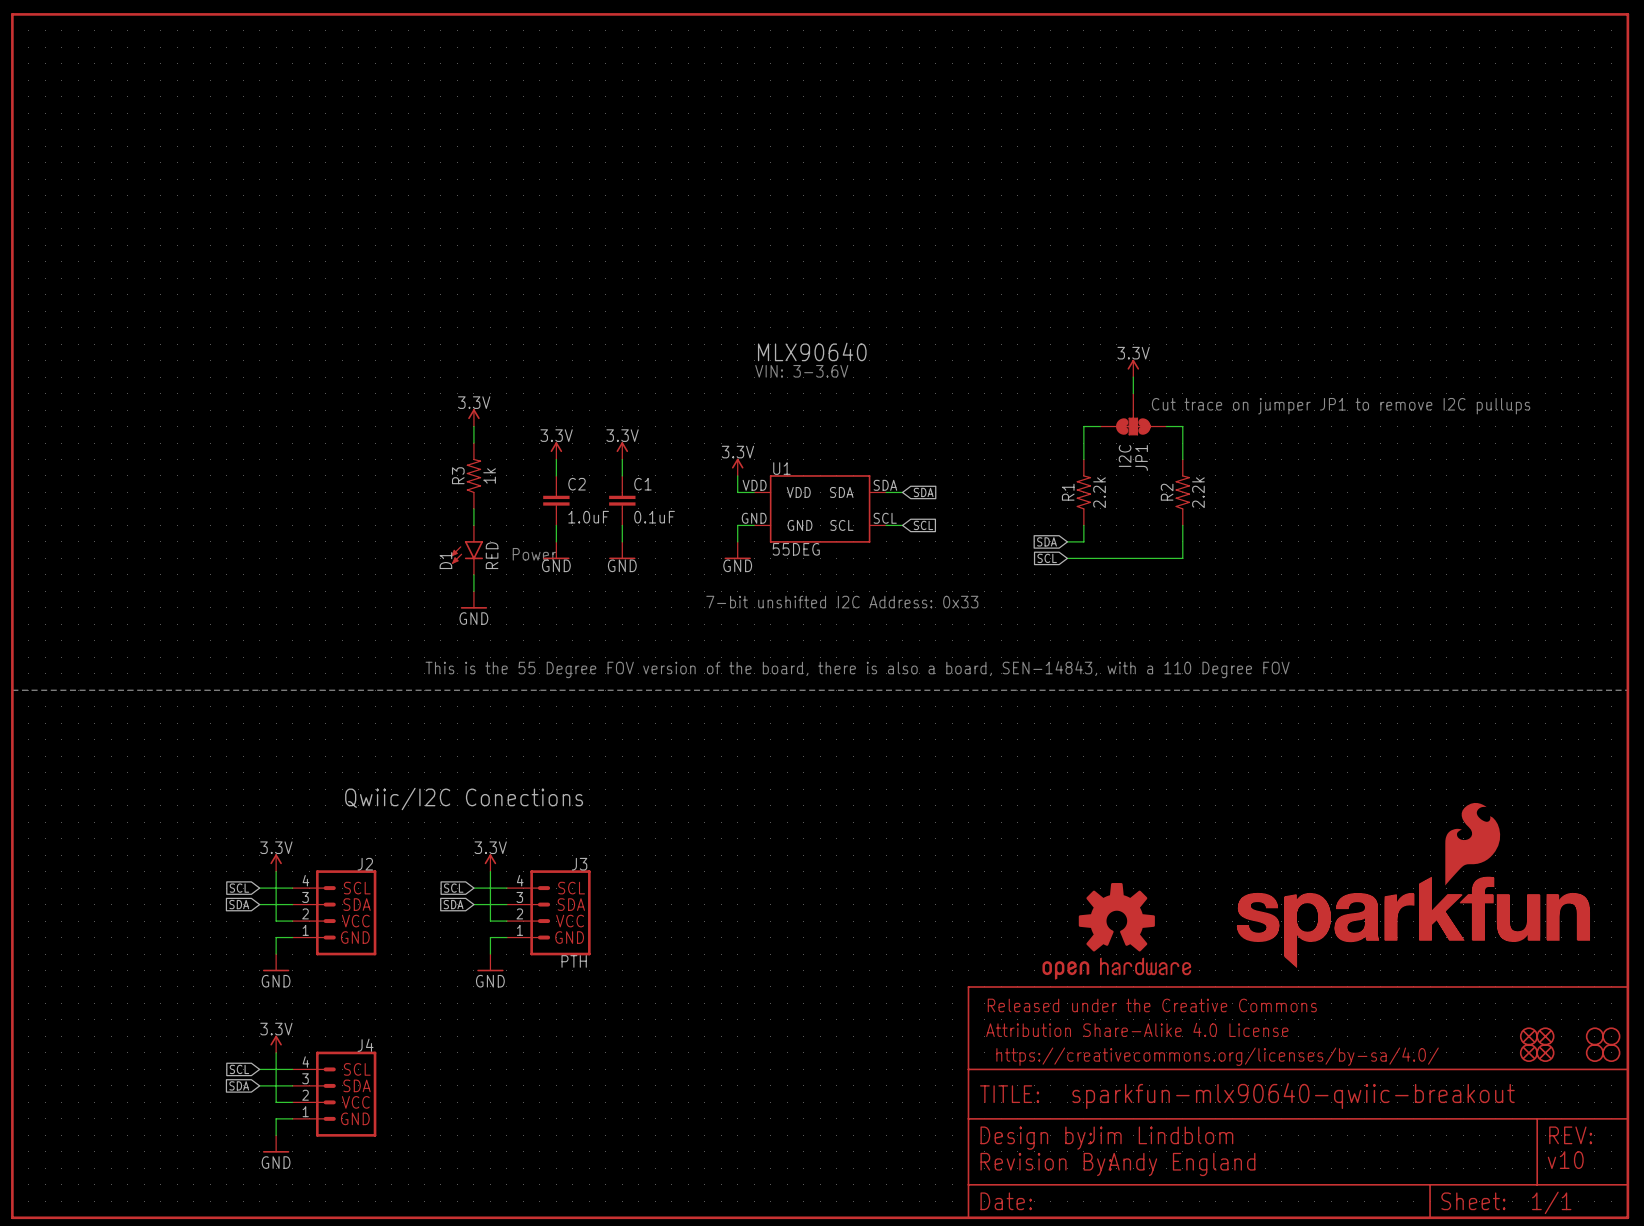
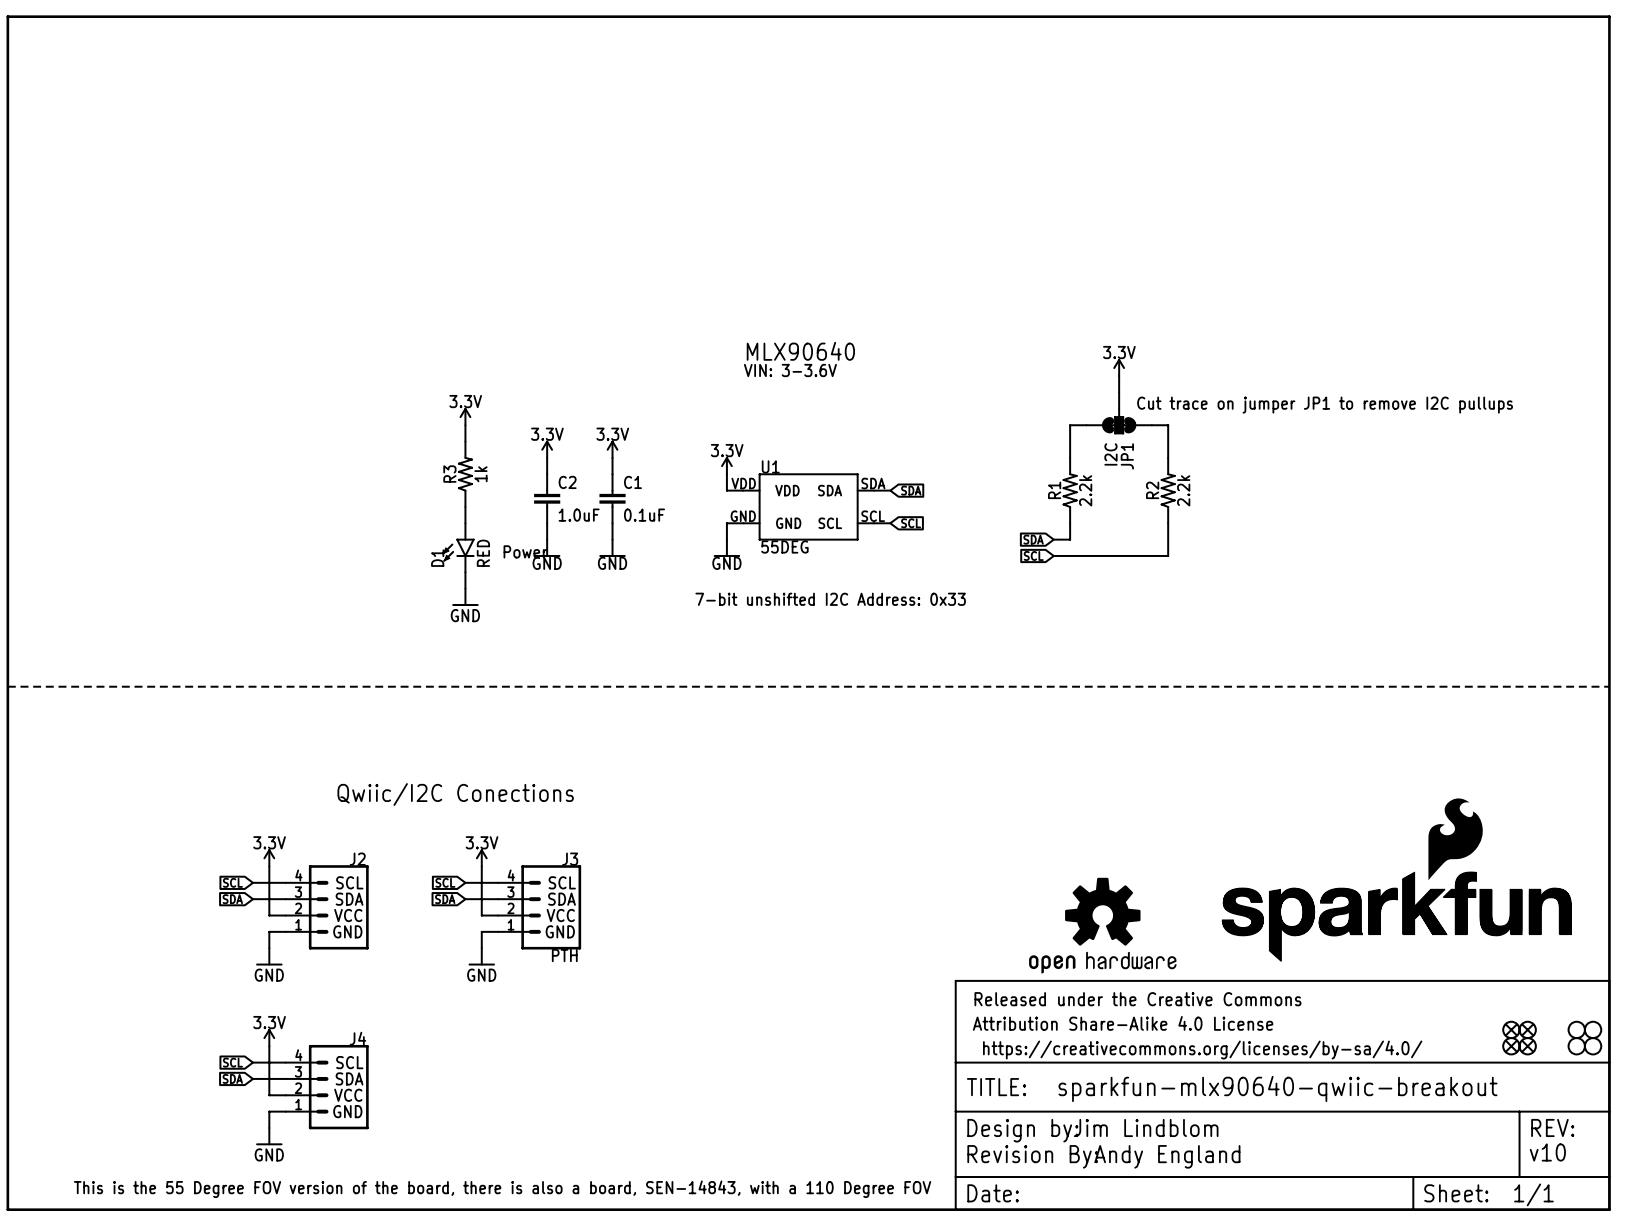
text: This is the 55 Degree FOV version of the board, there is also a board, SEN-14843, with a 110 Degree FOV (857, 669) -> none
text: none -> This is the 55 Degree FOV version of the board, there is also a board, SEN-14843, with a 110 Degree FOV (502, 1189)

